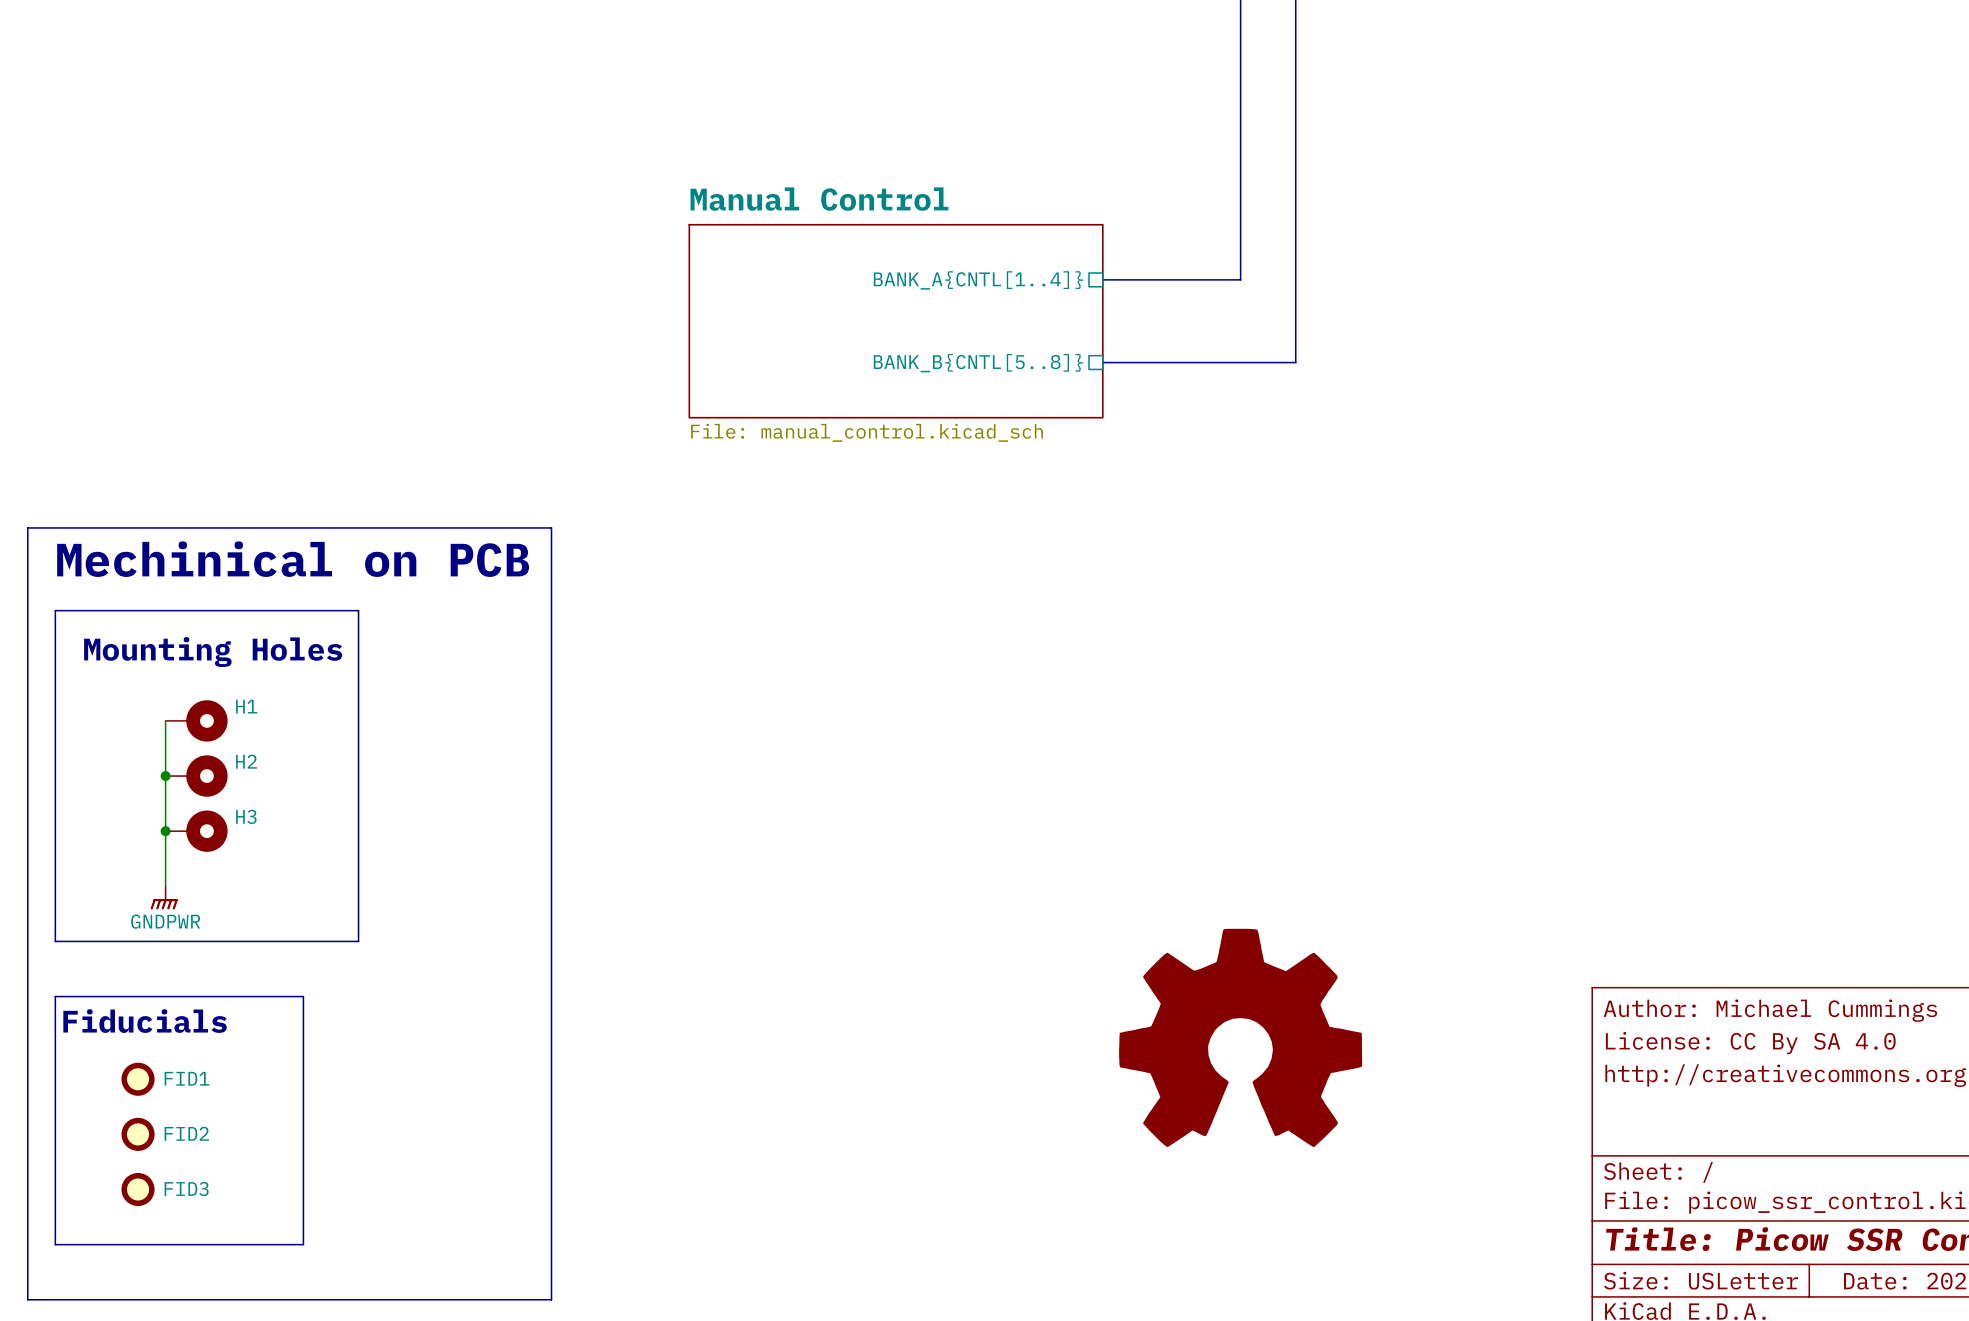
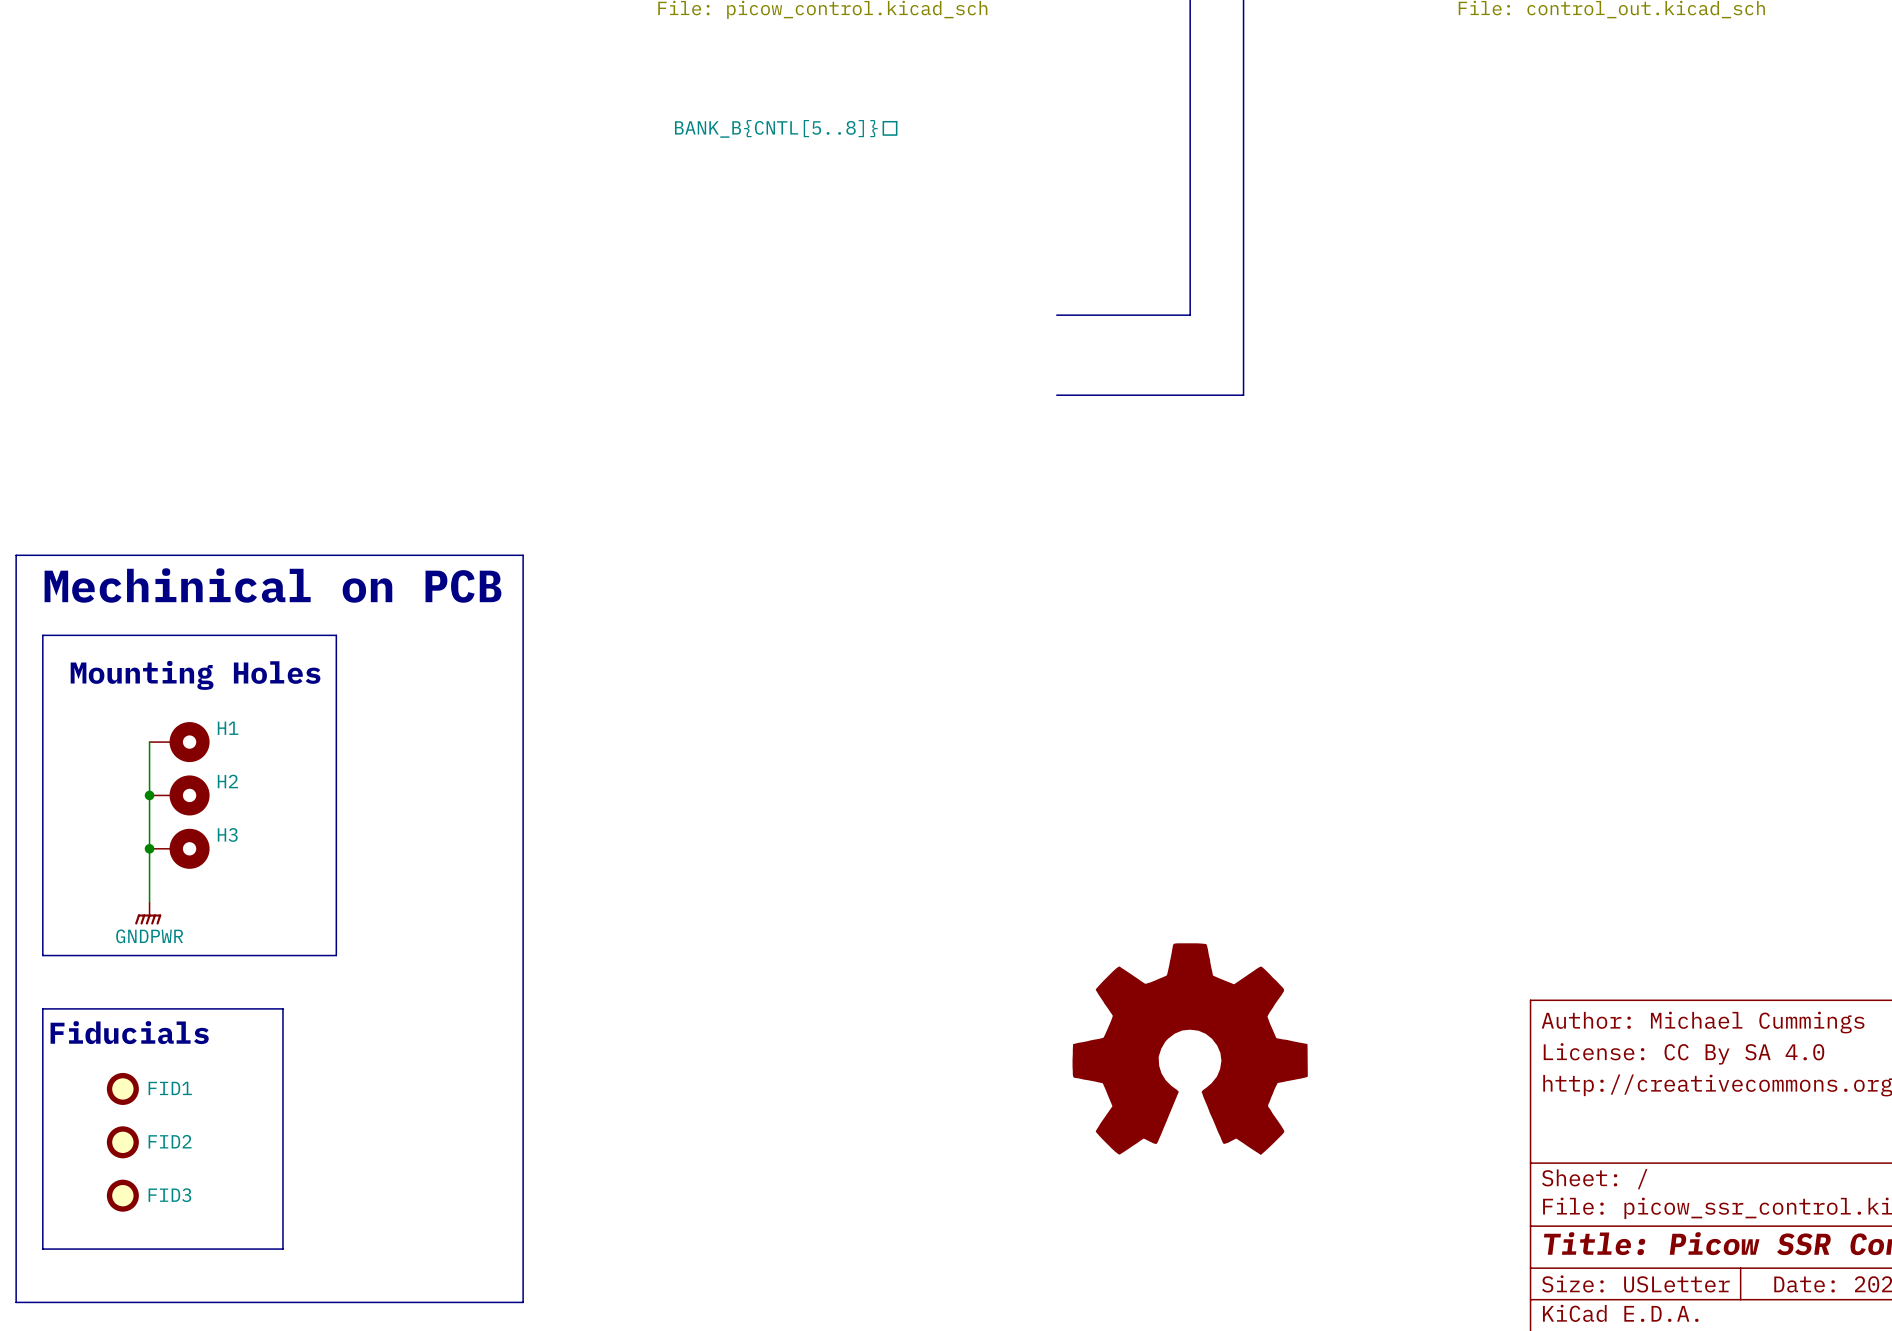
sheet pin: none -> BANK_B{CNTL[5..8]} (776, 128)
sheet pin: BANK_A{CNTL[1..4]} (978, 280) -> none
sheet Manual Control: File: manual_control.kicad_sch (896, 321) -> none
sheet pin: BANK_B{CNTL[5..8]} (978, 363) -> none

